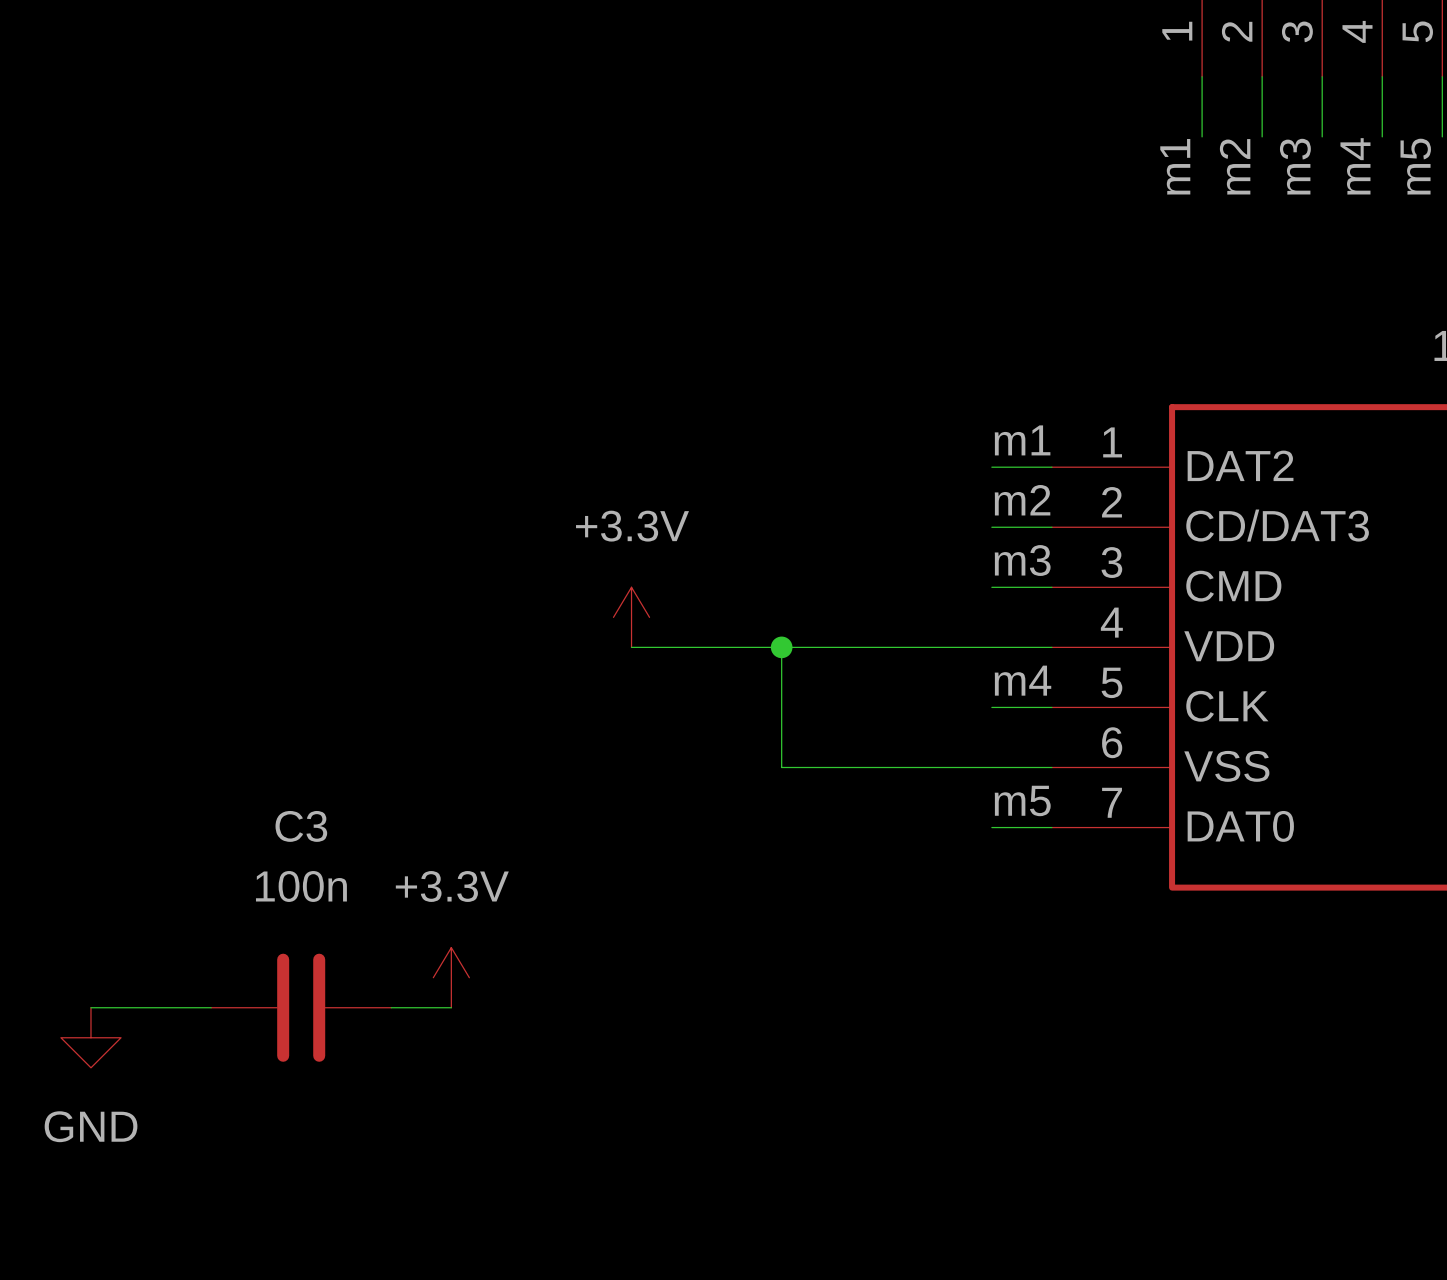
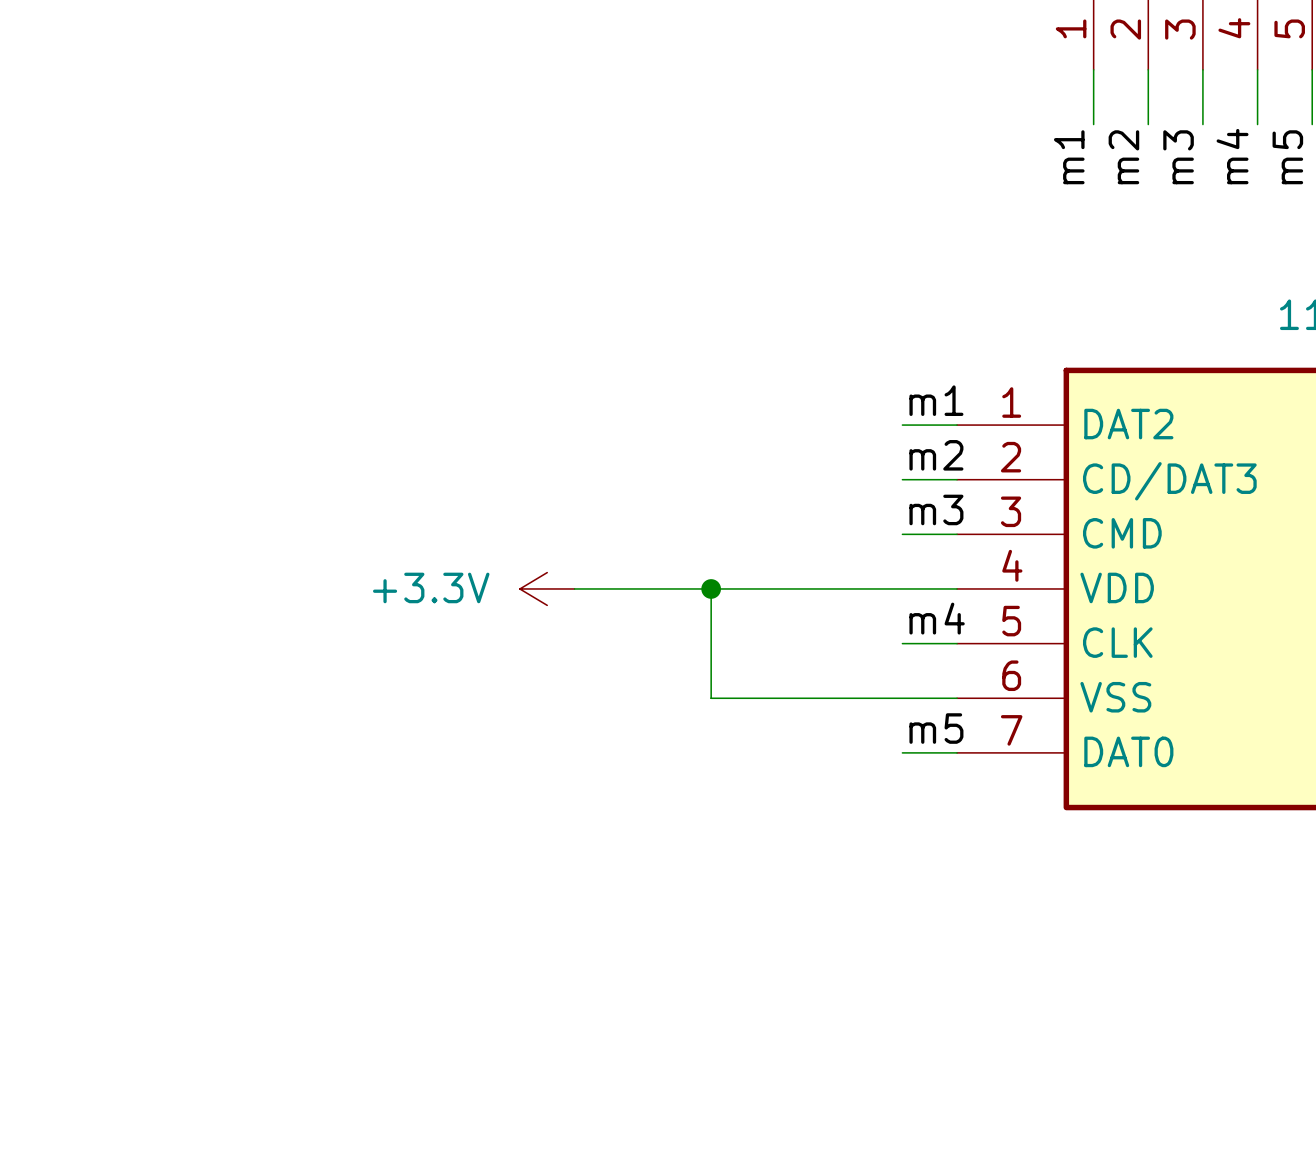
power symbol text position: +3.3V (632, 526) -> +3.3V (431, 587)
power symbol rotation: 0° (631, 617) -> 90° counterclockwise (547, 588)
power symbol position: +3.3V (631, 617) -> +3.3V (547, 588)
power symbol: +3.3V (451, 977) -> none
wire: (90, 1007) (211, 1007) -> none
C3: 100n (301, 1007) -> none
wire: (391, 1007) (451, 1007) -> none
power symbol: GND (90, 1037) -> none

